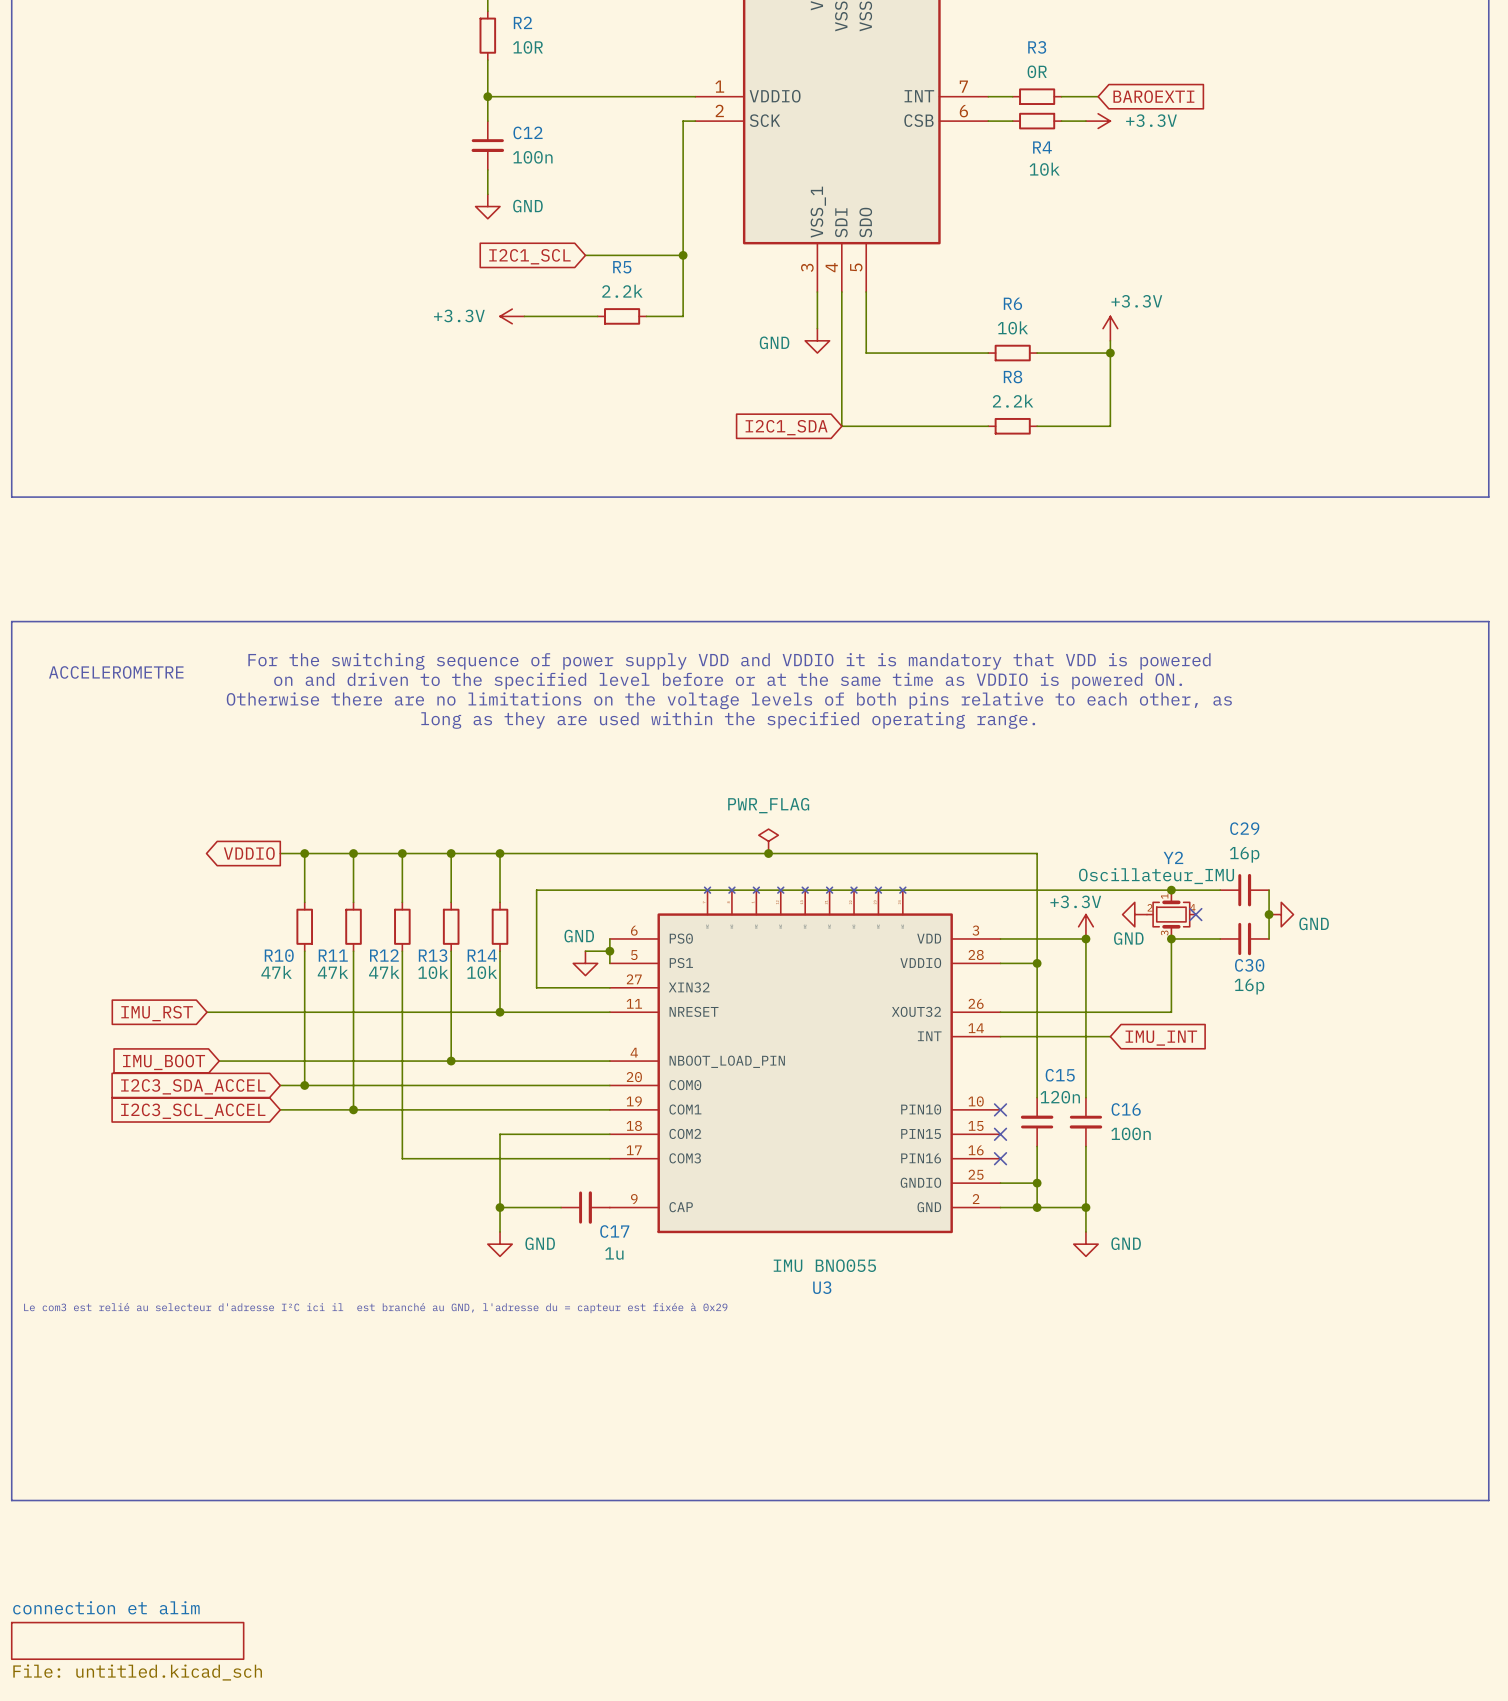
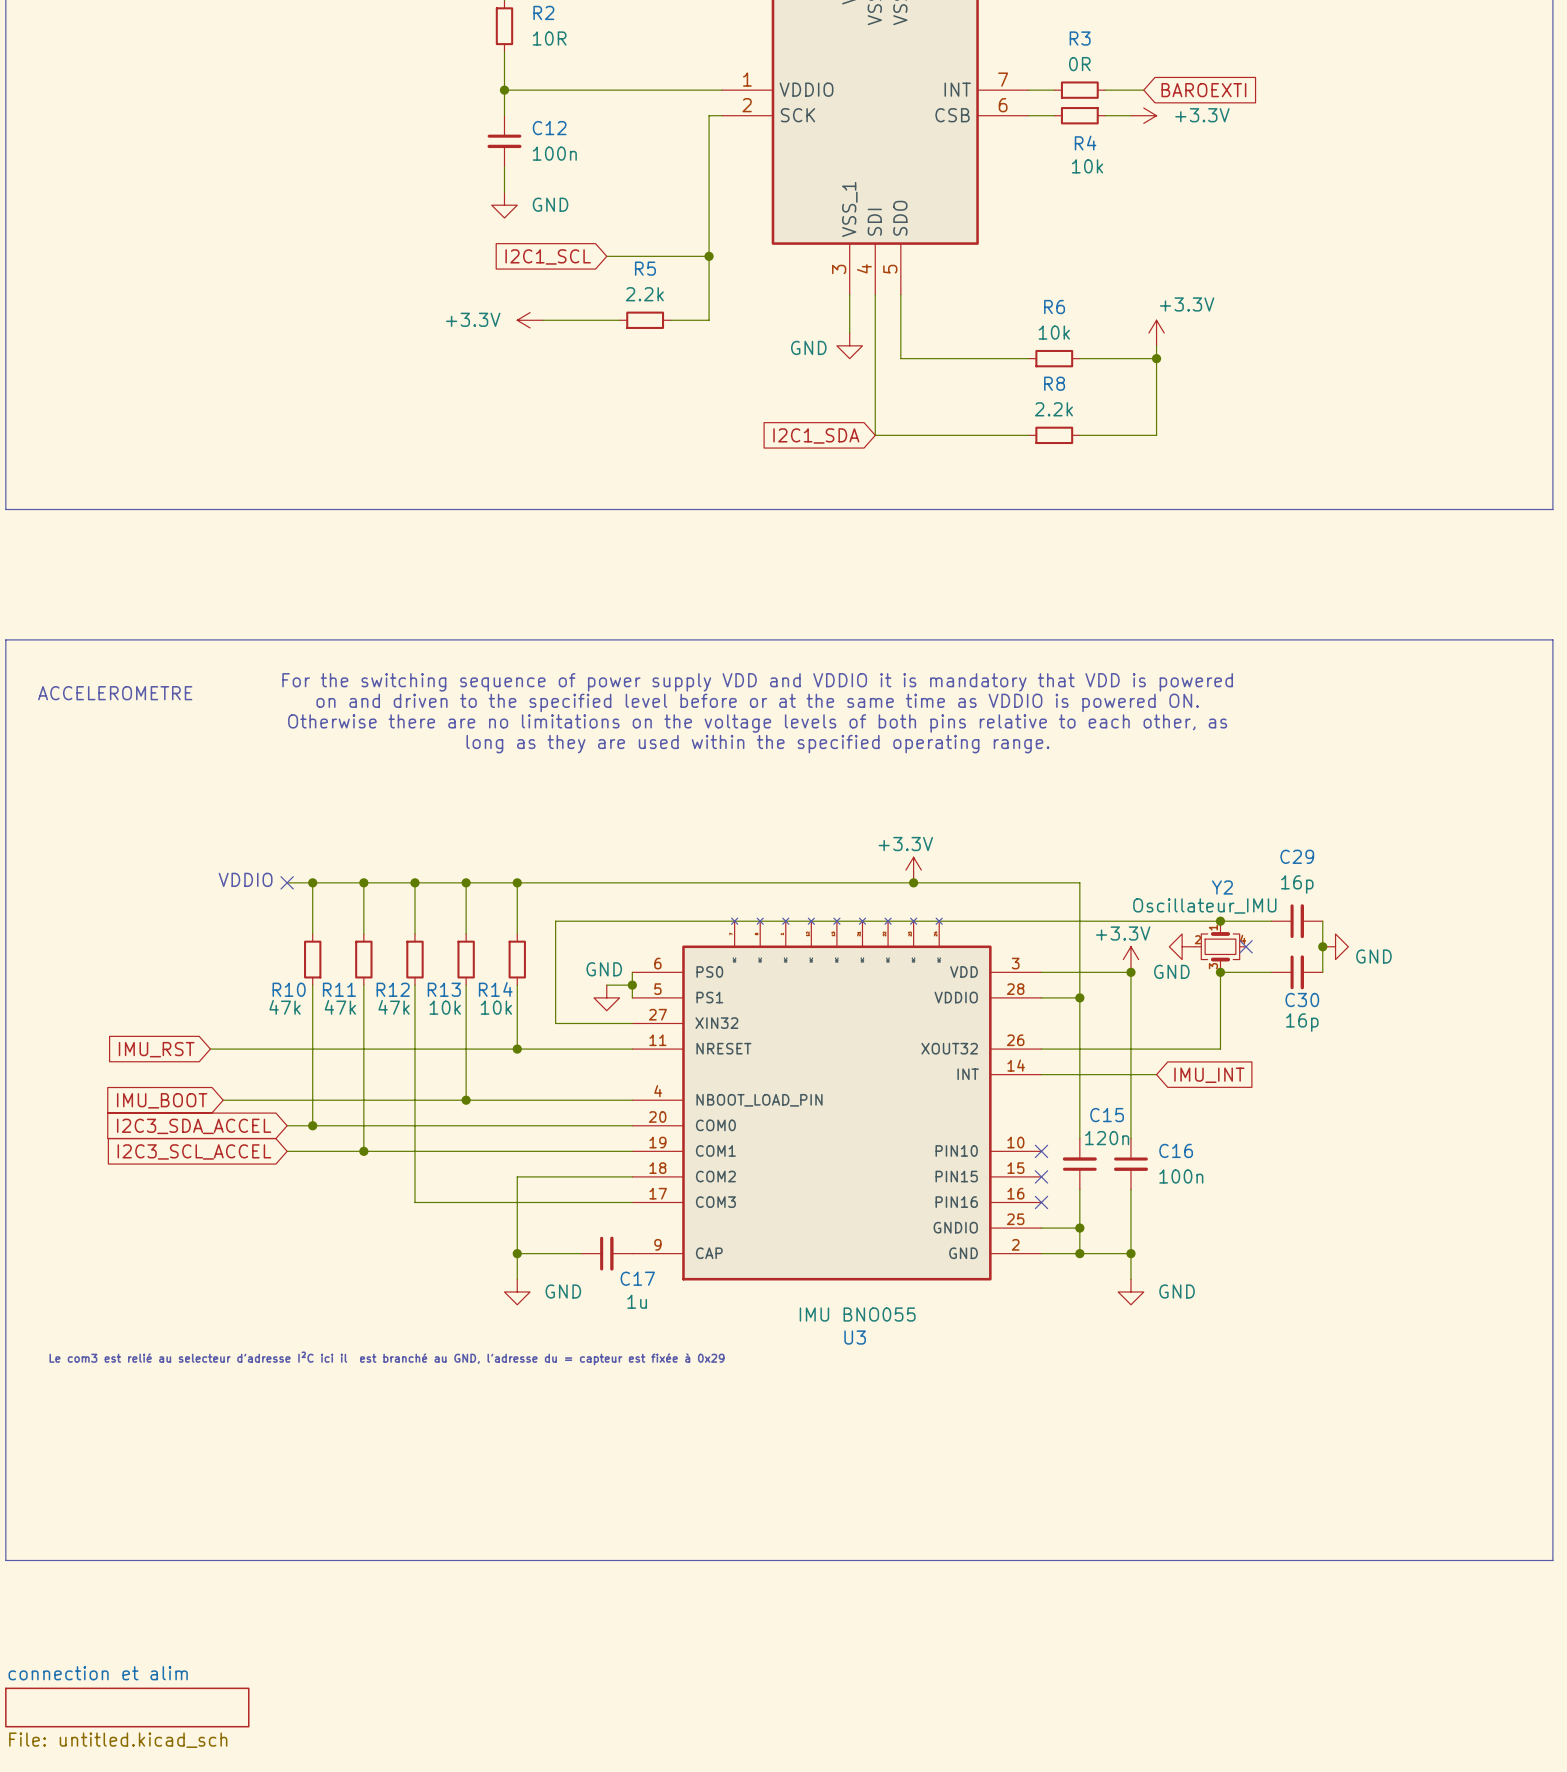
power symbol: PWR_FLAG (768, 841) -> none
power symbol: none -> +3.3V (913, 870)
text: none -> VDDIO (245, 879)
global label: VDDIO (249, 853) -> none
no-connect mark: none -> (287, 882)
junction: (768, 853) -> none
junction: none -> (913, 882)

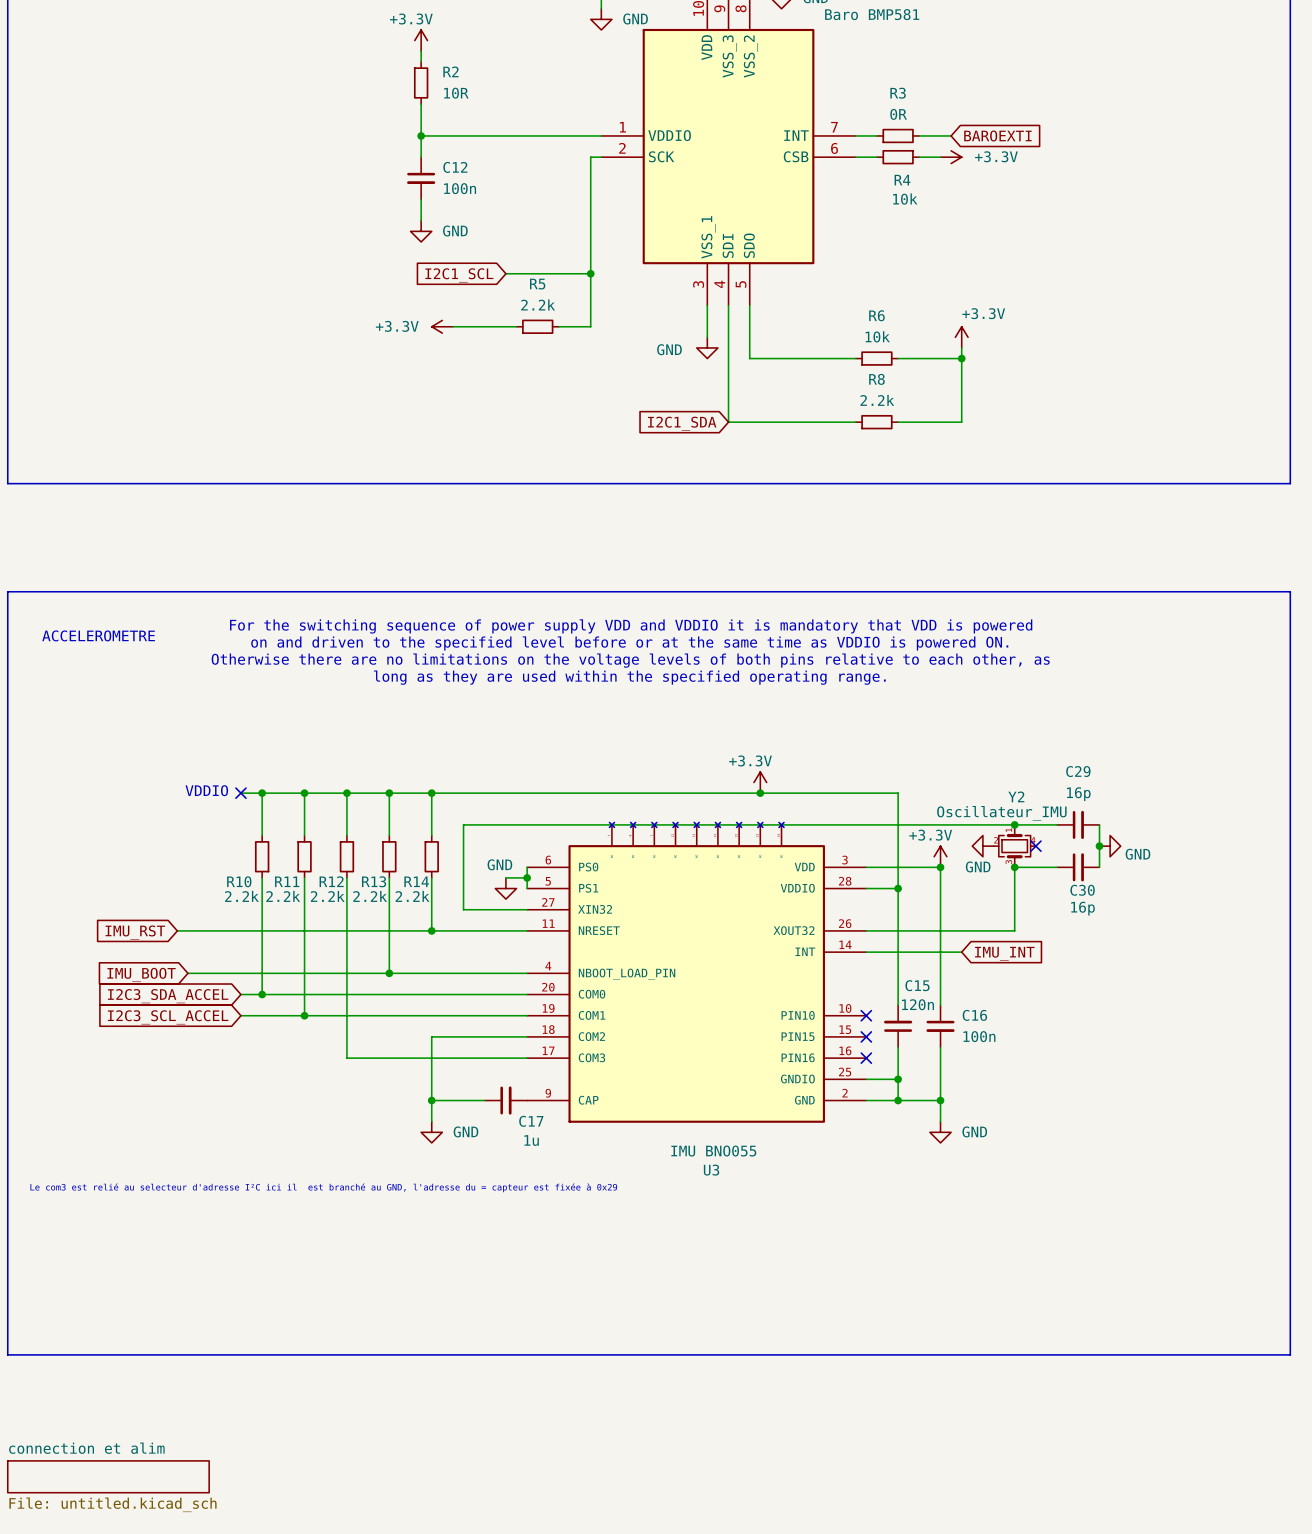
R10 value: 47k (285, 1007) -> 2.2k (241, 896)
R11 value: 47k (340, 1007) -> 2.2k (283, 896)
R12 value: 47k (394, 1007) -> 2.2k (327, 896)
R13 value: 10k (445, 1007) -> 2.2k (370, 896)
R14 value: 10k (496, 1007) -> 2.2k (412, 896)

